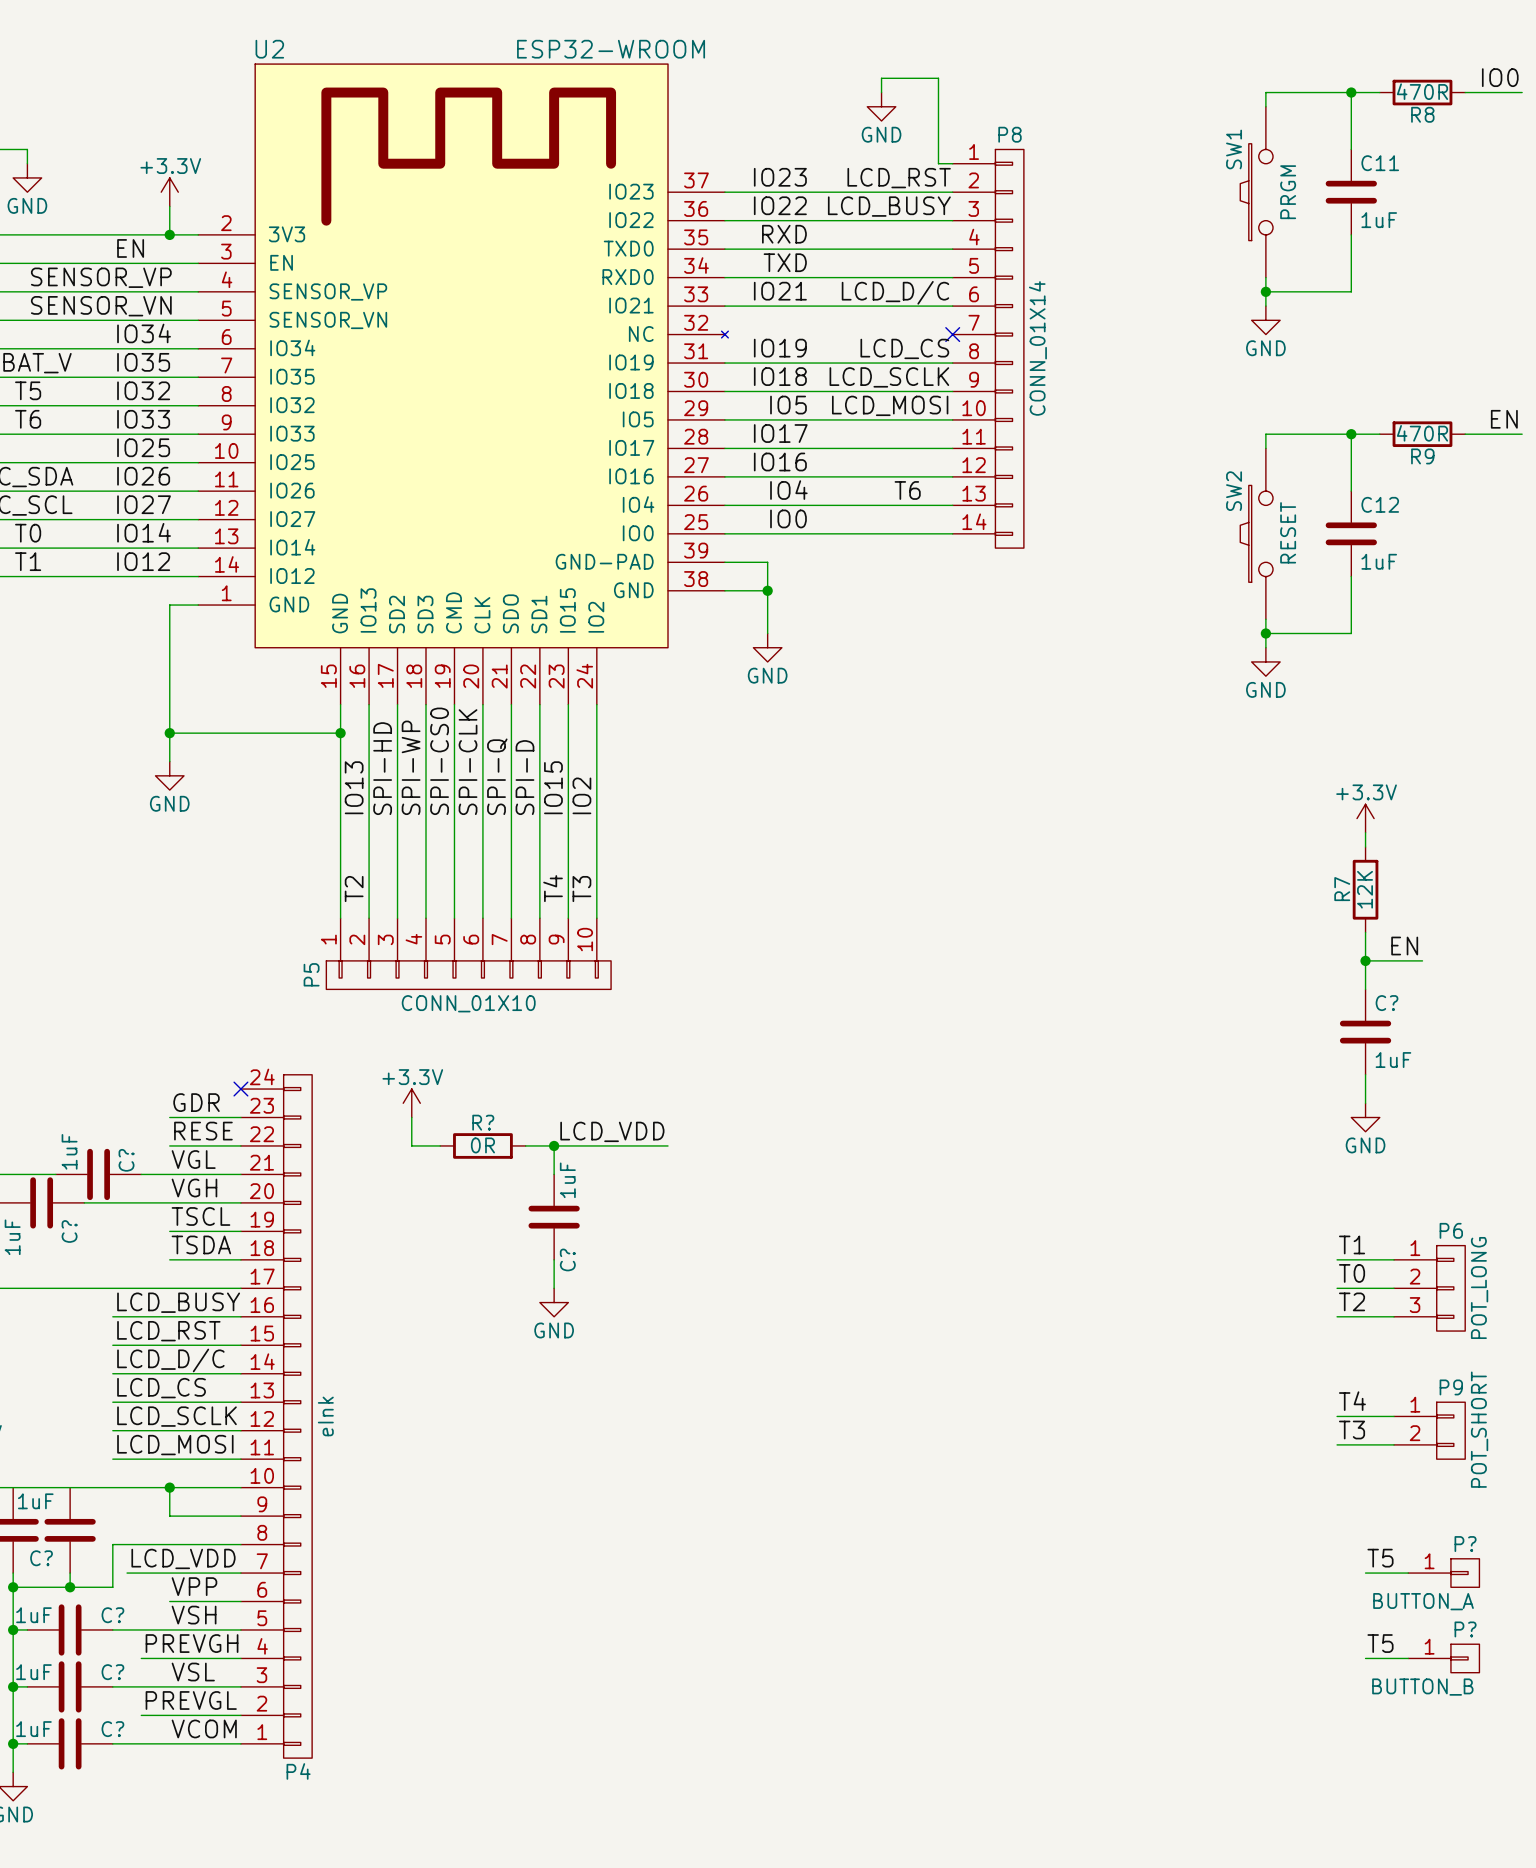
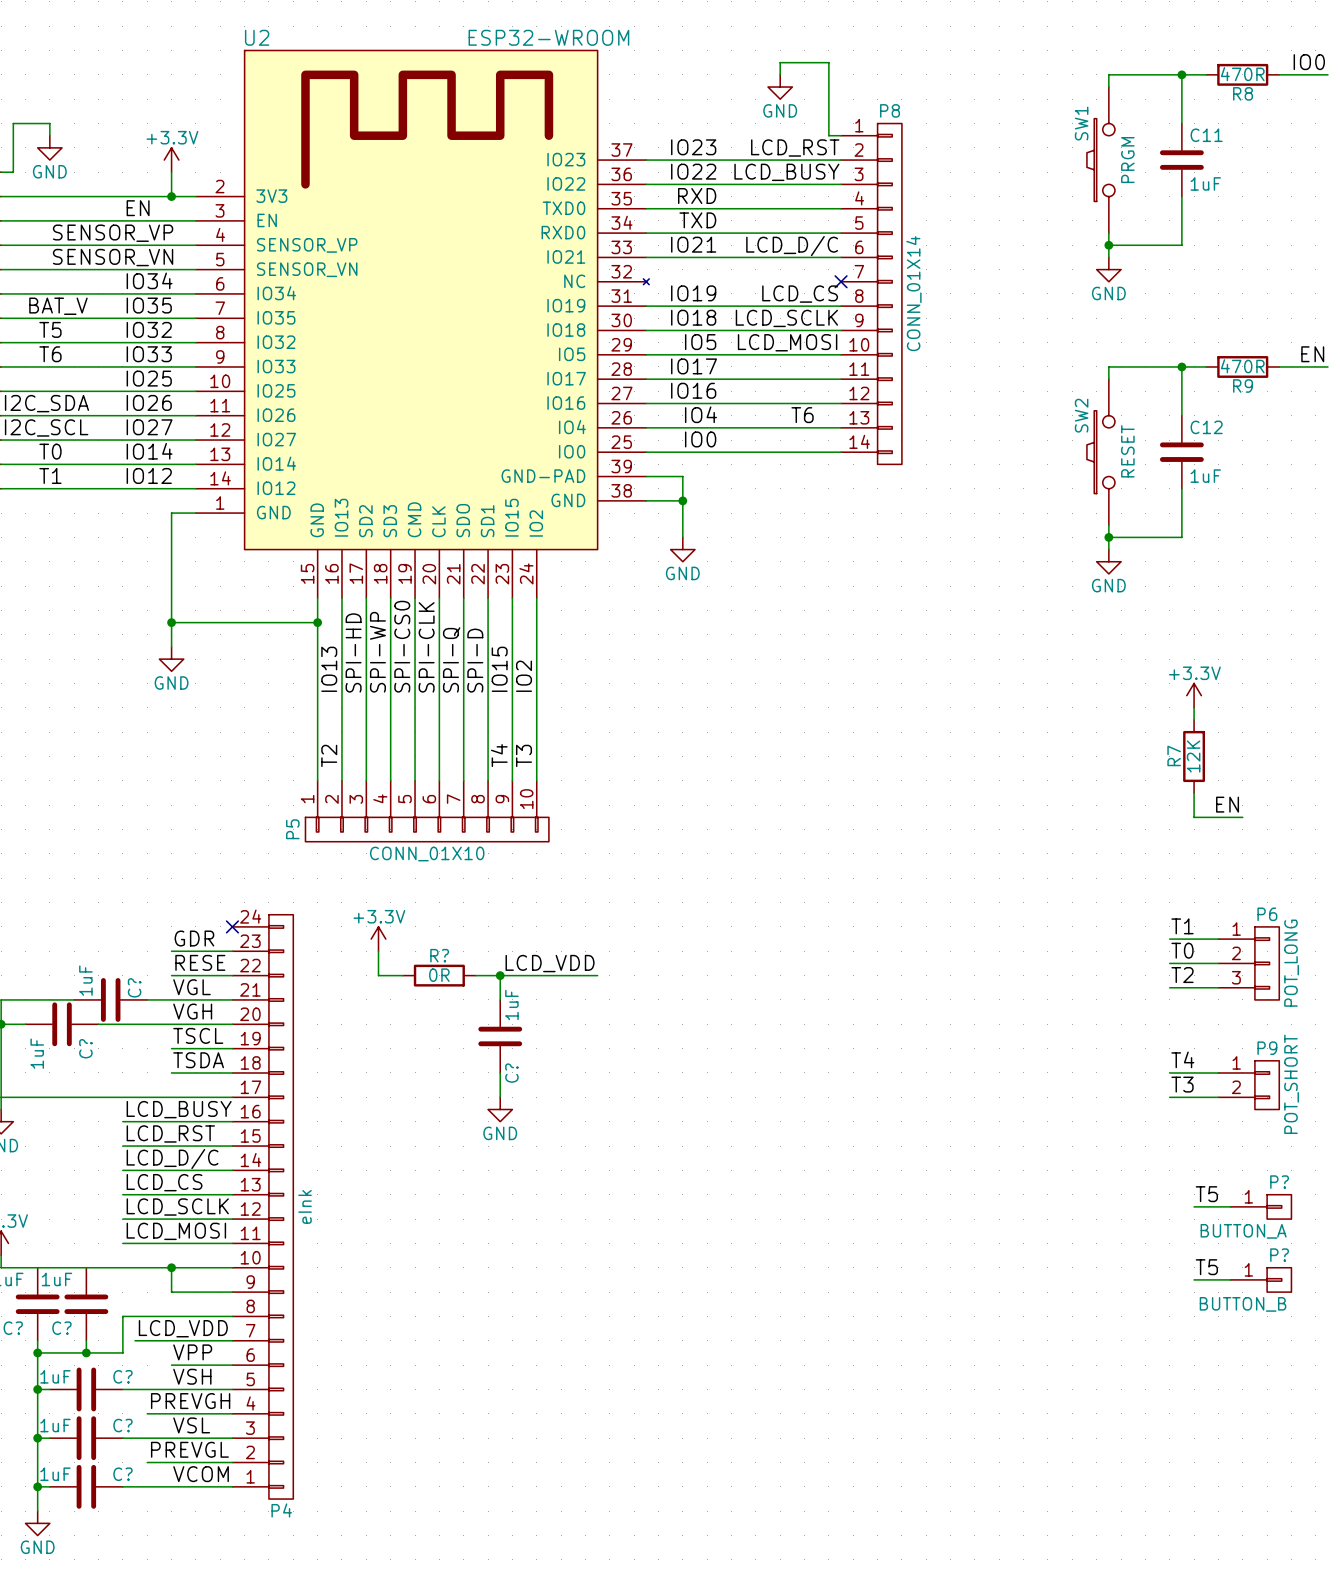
wire: (1365, 960) (1365, 989) -> none
junction: (1365, 960) -> none
C?: 1uF (1365, 1032) -> none
wire: (1365, 1074) (1365, 1103) -> none
label: none -> T1 (1182, 926)
wire: none -> (1169, 939) (1218, 939)
label: none -> T0 (1182, 950)
power symbol: GND (1365, 1117) -> none
wire: none -> (1169, 963) (1218, 963)
label: T1 (1352, 1244) -> T4 (1182, 1059)
label: T0 (1352, 1273) -> T3 (1182, 1084)
P6 position: (1429, 1288) -> (1248, 963)
label position: T2 (1352, 1301) -> T2 (1182, 975)
wire: (1337, 1316) (1394, 1316) -> (1169, 987) (1218, 987)
label: T4 (1352, 1401) -> none
label: none -> T5 (1206, 1194)
wire: (1337, 1416) (1365, 1416) -> none
label: T3 (1352, 1430) -> none
P9 position: (1429, 1430) -> (1248, 1085)
wire: (1337, 1444) (1394, 1444) -> none
label position: T5 (1380, 1558) -> T5 (1206, 1267)
wire: (1365, 1573) (1408, 1573) -> none
P? position: (1443, 1573) -> (1261, 1206)
label: T5 (1380, 1643) -> none
wire: (1365, 1658) (1408, 1658) -> (1194, 1279) (1230, 1279)
P? position: (1443, 1658) -> (1261, 1279)

